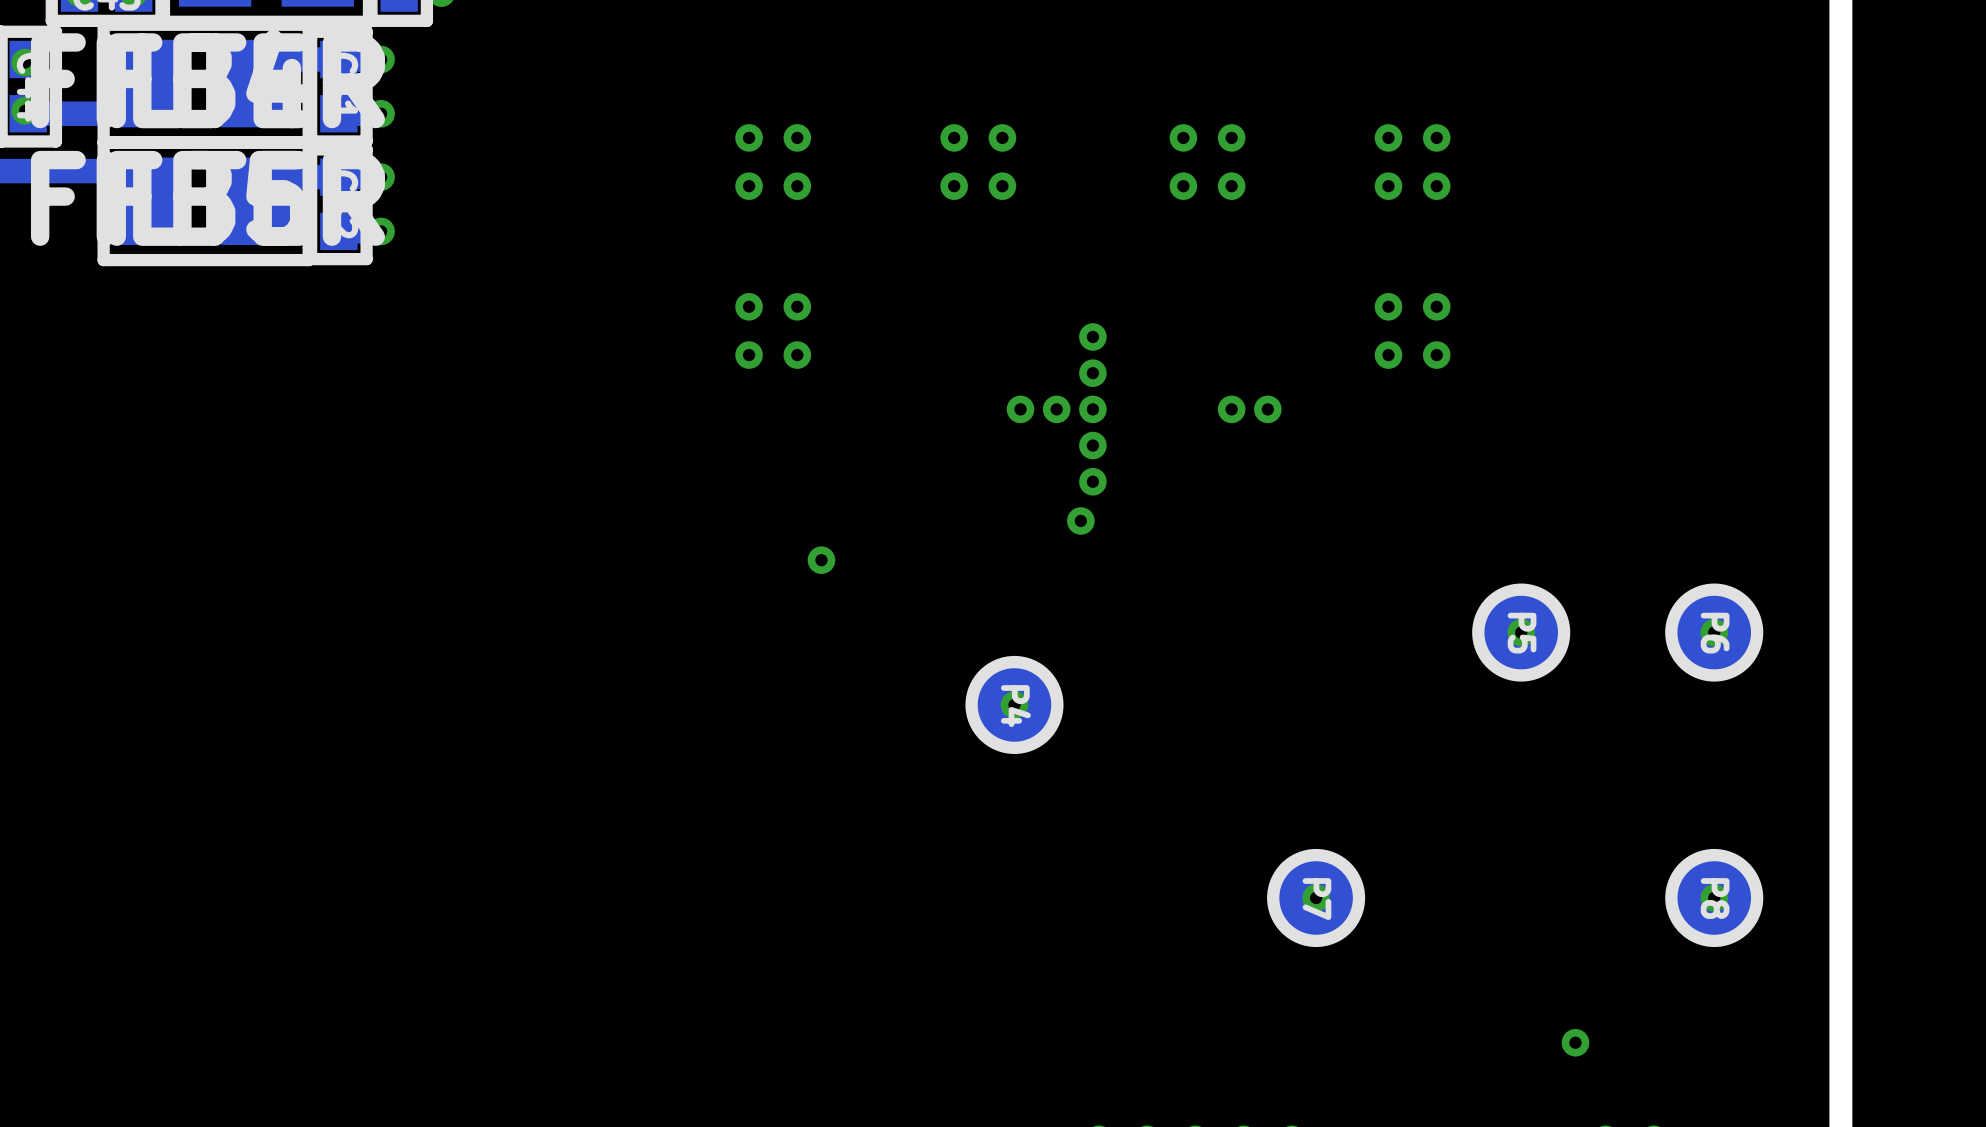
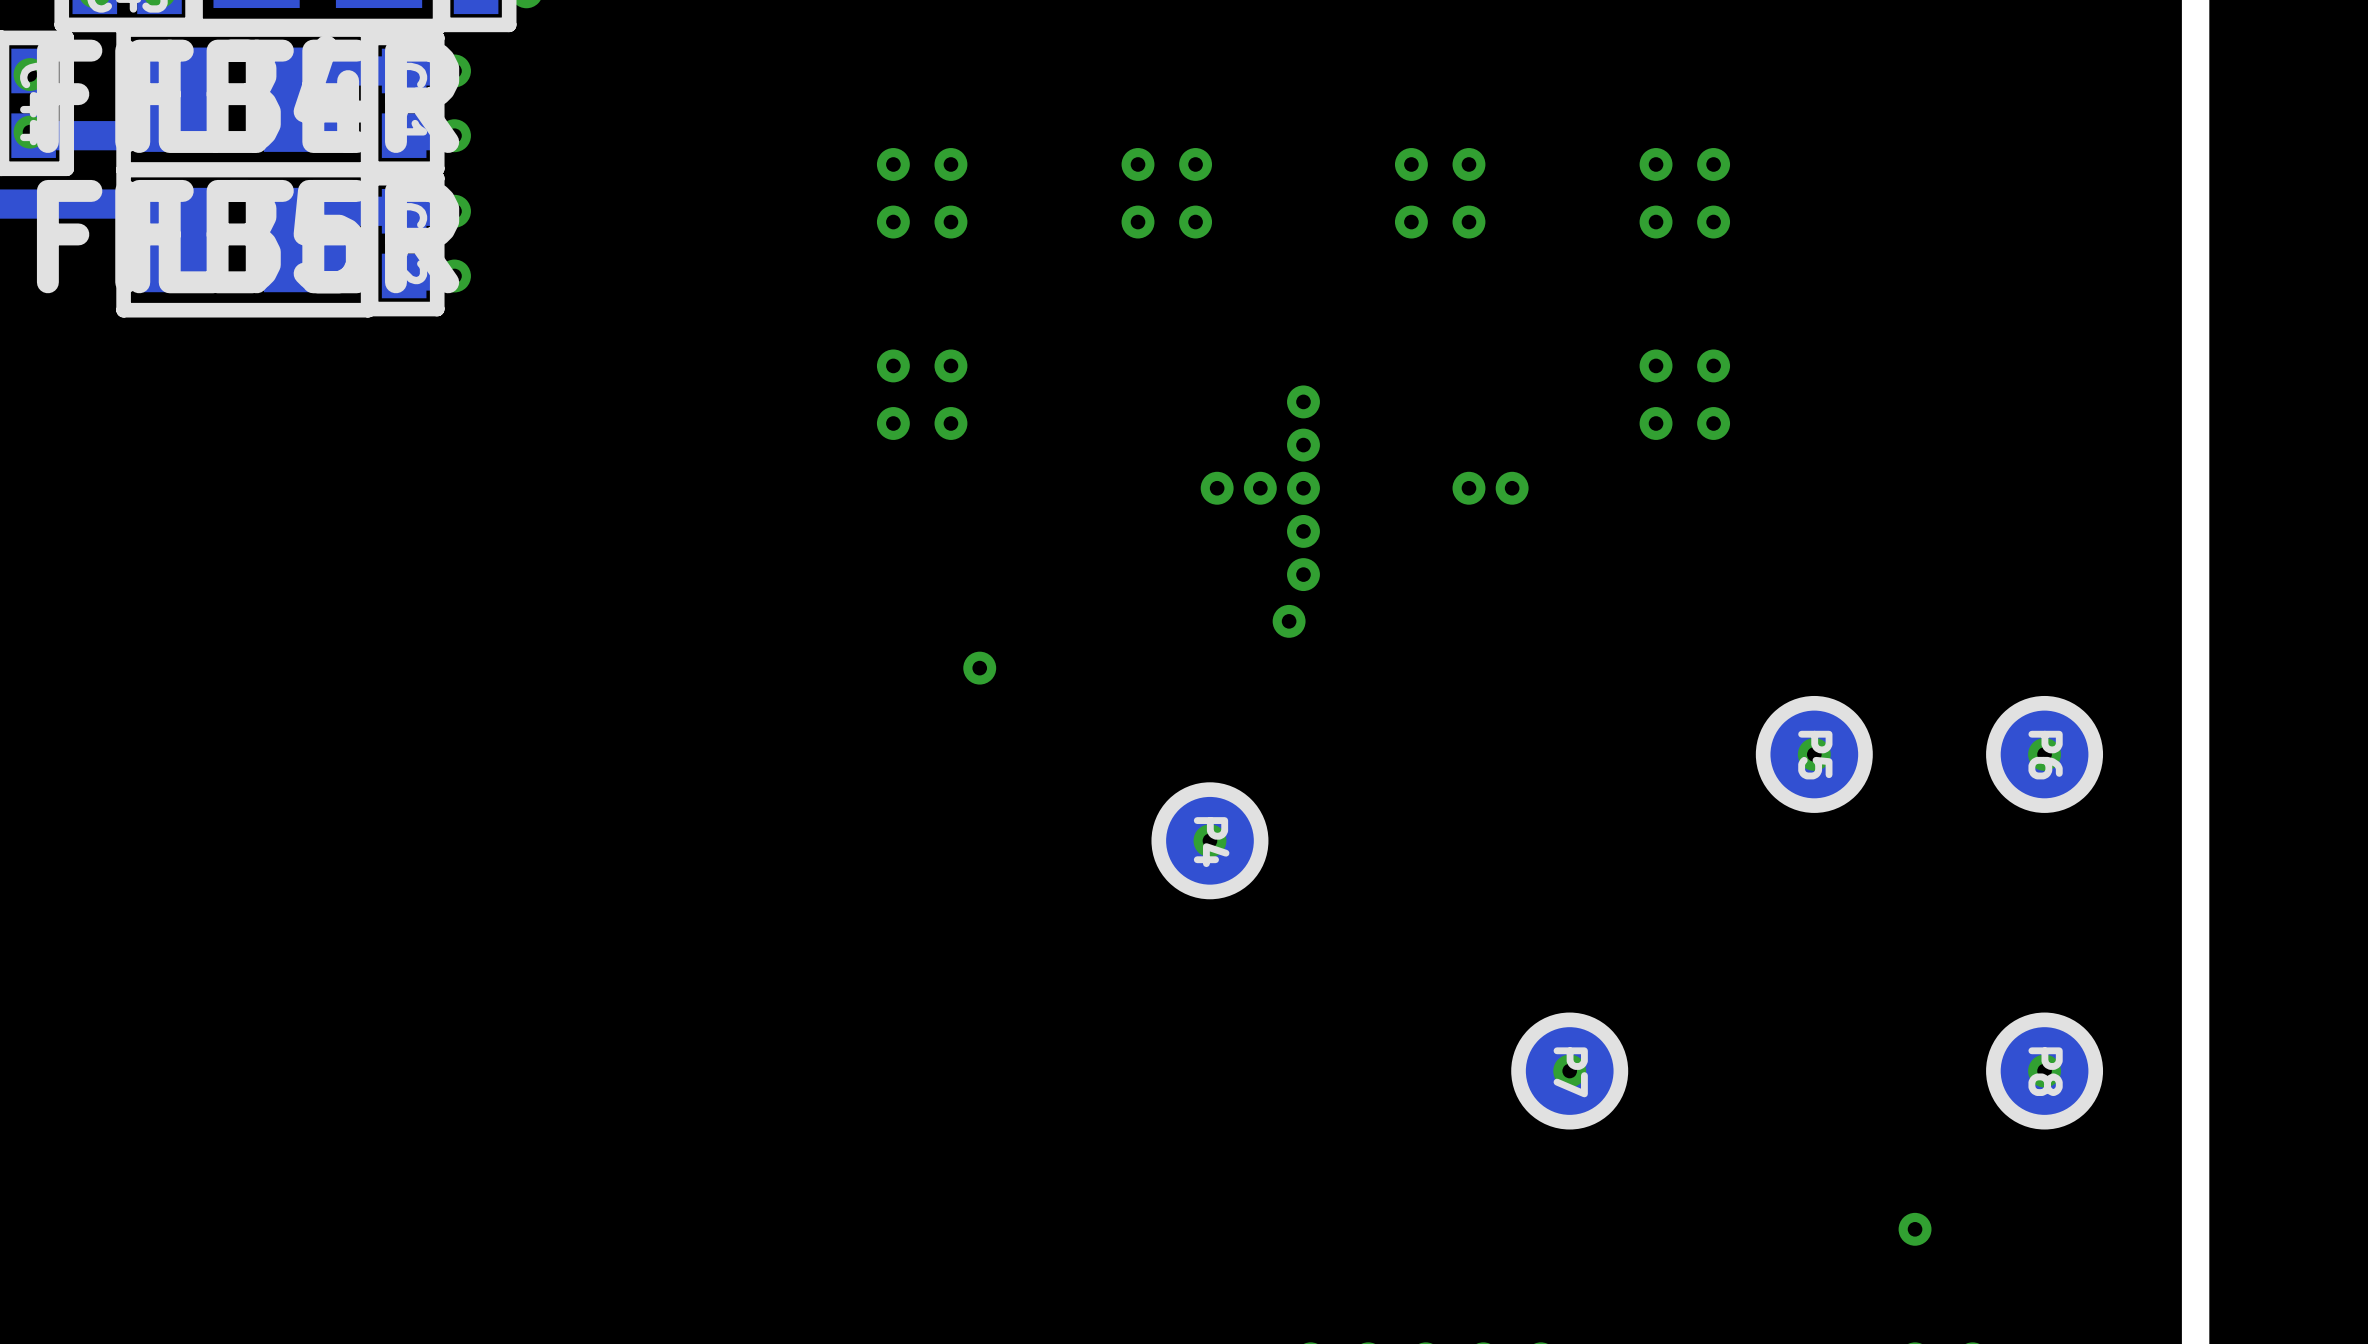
via position: (1575, 1042) -> (1915, 1229)

